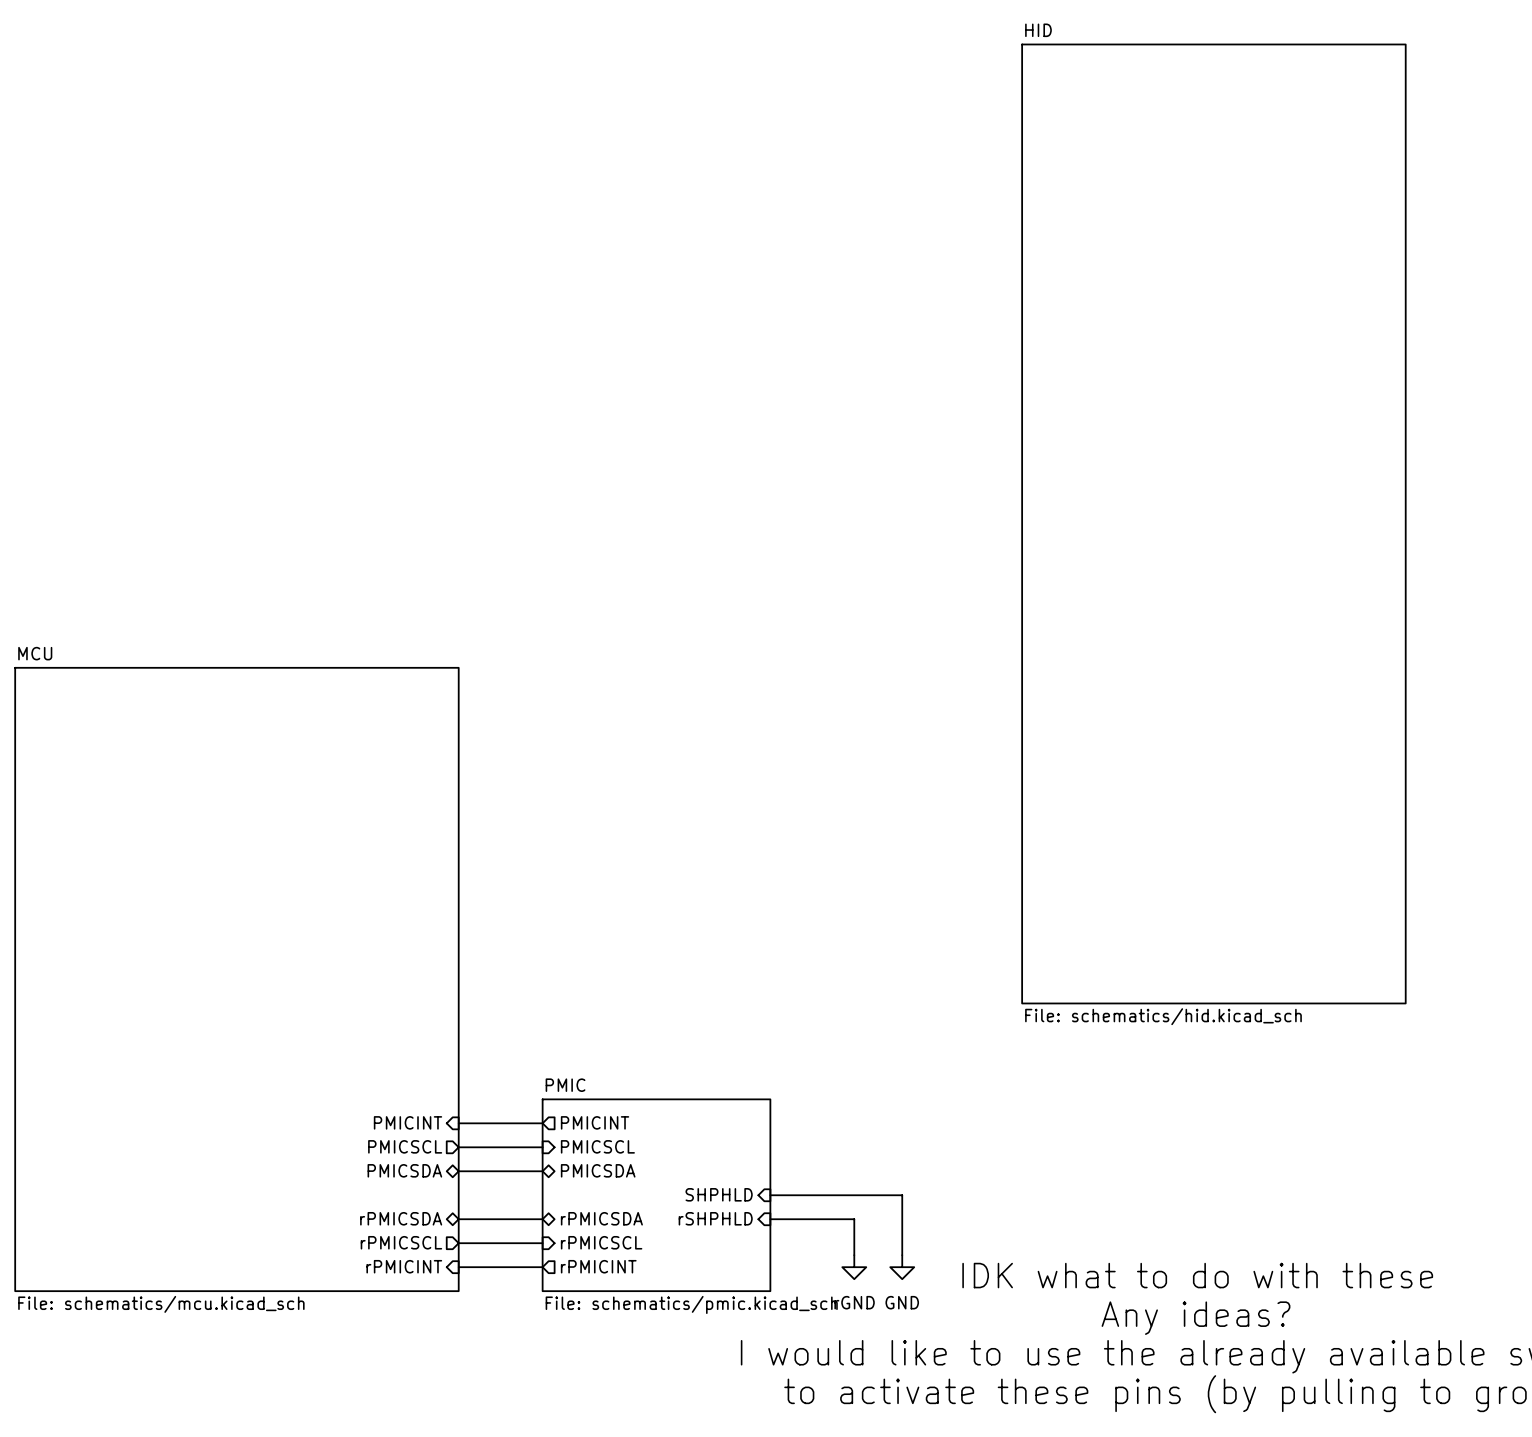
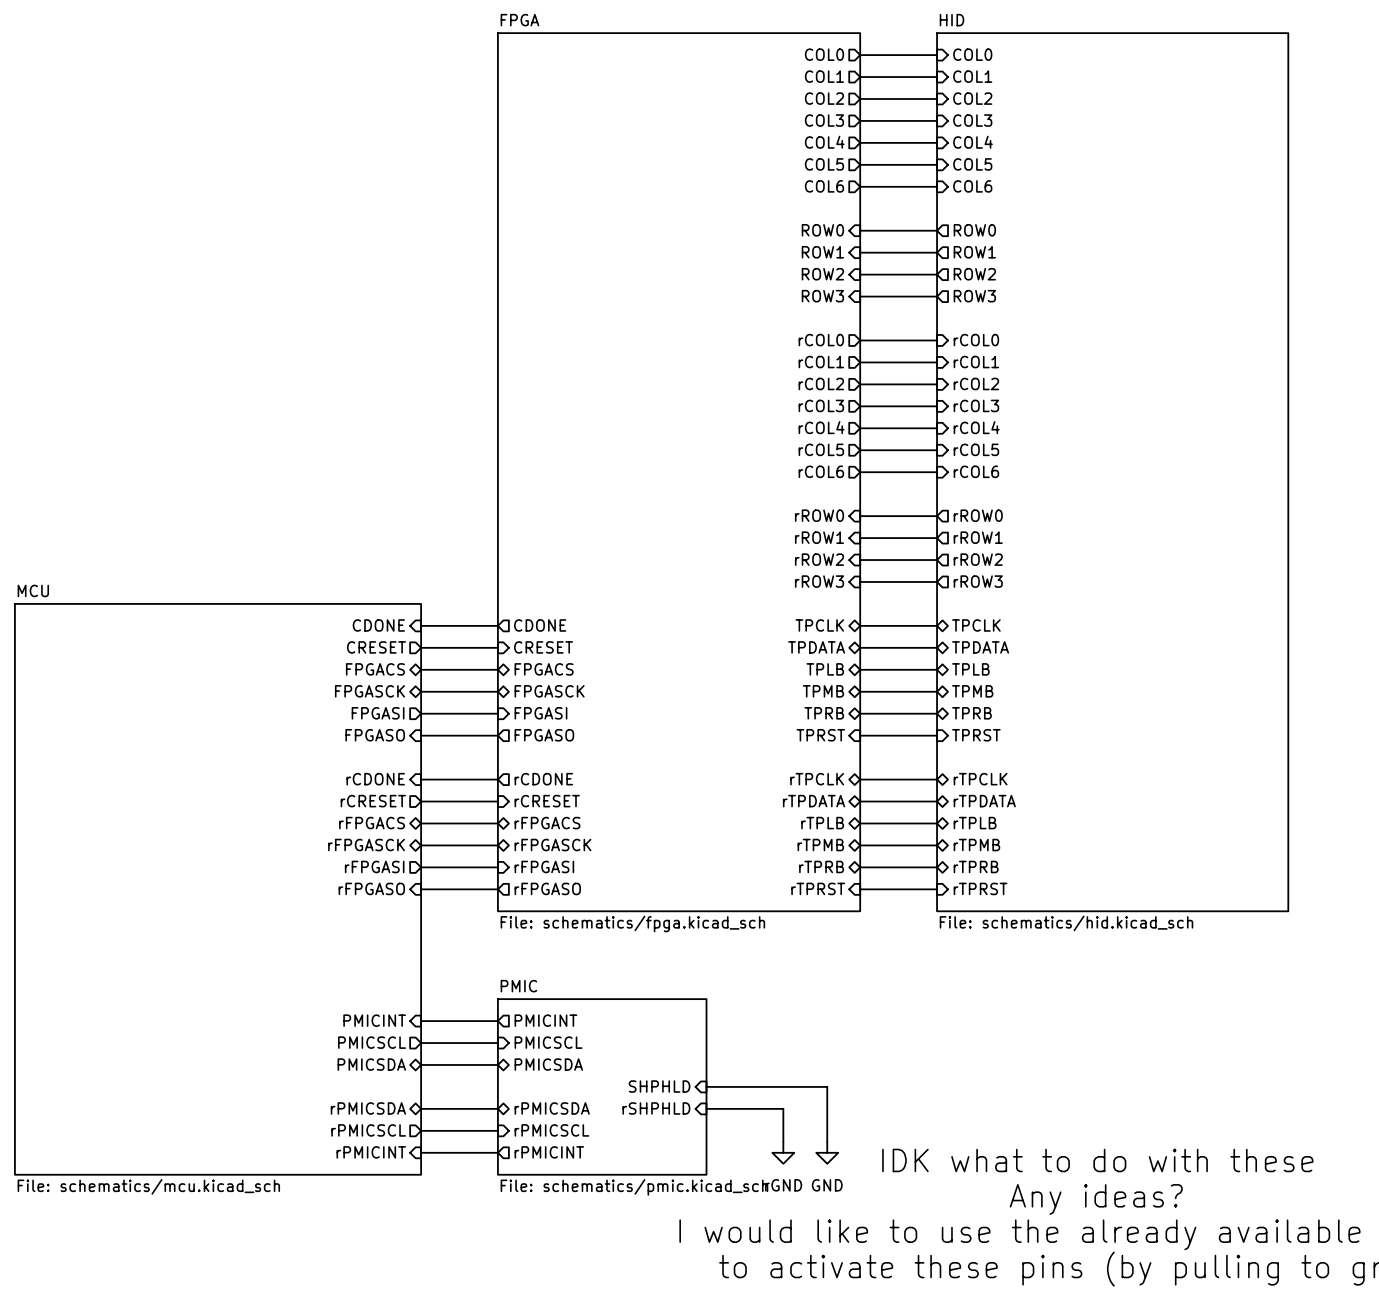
sheet pin: none -> COL0 (824, 54)
wire: none -> (860, 55) (937, 55)
sheet pin: none -> COL0 (972, 54)
sheet pin: none -> COL1 (824, 76)
sheet pin: none -> COL1 (972, 76)
wire: none -> (860, 77) (937, 77)
sheet pin: none -> COL2 (824, 98)
sheet pin: none -> COL2 (972, 98)
wire: none -> (860, 98) (937, 98)
sheet pin: none -> COL3 (824, 120)
sheet pin: none -> COL3 (972, 120)
wire: none -> (860, 120) (937, 120)
sheet pin: none -> COL4 (824, 142)
sheet pin: none -> COL4 (973, 142)
wire: none -> (860, 142) (937, 142)
sheet pin: none -> COL5 (824, 164)
sheet pin: none -> COL5 (972, 164)
wire: none -> (860, 164) (937, 164)
sheet pin: none -> COL6 (824, 186)
sheet pin: none -> COL6 (972, 186)
wire: none -> (860, 186) (937, 186)
sheet pin: none -> ROW0 (822, 230)
sheet pin: none -> ROW0 (974, 230)
wire: none -> (860, 230) (937, 230)
sheet pin: none -> ROW1 (822, 252)
sheet pin: none -> ROW1 (974, 252)
wire: none -> (860, 252) (937, 252)
sheet pin: none -> ROW2 (822, 274)
sheet pin: none -> ROW2 (974, 274)
wire: none -> (860, 274) (937, 274)
sheet pin: none -> ROW3 (822, 296)
sheet pin: none -> ROW3 (974, 296)
wire: none -> (860, 296) (937, 296)
sheet pin: none -> rCOL0 (821, 340)
sheet pin: none -> rCOL0 (976, 340)
wire: none -> (860, 340) (937, 340)
sheet pin: none -> rCOL1 (821, 362)
sheet pin: none -> rCOL1 (976, 362)
wire: none -> (860, 362) (937, 362)
sheet pin: none -> rCOL2 (821, 383)
sheet pin: none -> rCOL2 (976, 383)
wire: none -> (860, 384) (937, 384)
sheet pin: none -> rCOL3 (821, 405)
sheet pin: none -> rCOL3 (976, 405)
wire: none -> (860, 406) (937, 406)
sheet pin: none -> rCOL4 (821, 427)
sheet pin: none -> rCOL4 (976, 427)
wire: none -> (860, 428) (937, 428)
sheet pin: none -> rCOL5 (821, 449)
wire: none -> (860, 450) (937, 450)
sheet pin: none -> rCOL5 (976, 449)
sheet FPGA: none -> File: schematics/fpga.kicad_sch (679, 472)
sheet pin: none -> rCOL6 (821, 471)
wire: none -> (860, 472) (937, 472)
sheet pin: none -> rCOL6 (976, 471)
sheet pin: none -> rROW0 (819, 515)
wire: none -> (860, 516) (937, 516)
sheet pin: none -> rROW0 (978, 515)
sheet pin: none -> rROW1 (819, 537)
wire: none -> (860, 538) (937, 538)
sheet pin: none -> rROW1 (978, 537)
sheet pin: none -> rROW2 (819, 559)
wire: none -> (860, 560) (937, 560)
sheet pin: none -> rROW2 (978, 559)
sheet pin: none -> rROW3 (819, 581)
wire: none -> (860, 581) (937, 581)
sheet pin: none -> rROW3 (978, 581)
sheet pin: none -> CDONE (378, 625)
wire: none -> (421, 625) (497, 625)
sheet pin: none -> CDONE (540, 625)
sheet pin: none -> TPCLK (819, 625)
wire: none -> (860, 625) (937, 625)
sheet pin: none -> TPCLK (976, 625)
sheet pin: none -> CRESET (376, 647)
wire: none -> (421, 647) (497, 647)
sheet pin: none -> CRESET (543, 647)
sheet pin: none -> TPDATA (816, 647)
wire: none -> (860, 647) (937, 647)
sheet pin: none -> TPDATA (980, 647)
sheet pin: none -> FPGACS (375, 669)
wire: none -> (421, 669) (497, 669)
sheet pin: none -> FPGACS (544, 669)
sheet pin: none -> TPLB (825, 669)
wire: none -> (860, 669) (937, 669)
sheet pin: none -> TPLB (970, 669)
sheet pin: none -> FPGASCK (369, 691)
wire: none -> (421, 691) (497, 691)
sheet pin: none -> FPGASCK (549, 691)
sheet pin: none -> TPMB (823, 691)
wire: none -> (860, 691) (937, 691)
sheet pin: none -> TPMB (972, 691)
sheet pin: none -> FPGASI (378, 713)
wire: none -> (421, 713) (497, 713)
sheet pin: none -> FPGASI (540, 713)
sheet pin: none -> TPRB (824, 713)
wire: none -> (860, 713) (937, 713)
sheet pin: none -> TPRB (971, 713)
sheet pin: none -> FPGASO (375, 735)
wire: none -> (421, 735) (497, 735)
sheet pin: none -> FPGASO (544, 735)
sheet pin: none -> TPRST (820, 735)
wire: none -> (860, 735) (937, 735)
sheet pin: none -> TPRST (976, 735)
sheet pin: none -> rCDONE (375, 779)
wire: none -> (421, 779) (497, 779)
sheet pin: none -> rCDONE (543, 779)
sheet pin: none -> rTPCLK (817, 779)
wire: none -> (860, 779) (937, 779)
sheet pin: none -> rTPCLK (980, 779)
sheet pin: none -> rCRESET (373, 801)
wire: none -> (421, 801) (497, 801)
sheet pin: none -> rCRESET (547, 801)
sheet pin: none -> rTPDATA (814, 801)
wire: none -> (860, 801) (937, 801)
sheet pin: none -> rTPDATA (984, 801)
sheet pin: none -> rFPGACS (372, 823)
wire: none -> (421, 823) (497, 823)
sheet pin: none -> rFPGACS (547, 823)
sheet pin: none -> rTPLB (822, 823)
wire: none -> (860, 823) (937, 823)
sheet pin: none -> rTPLB (975, 823)
sheet pin: none -> rFPGASCK (366, 845)
wire: none -> (421, 845) (497, 845)
sheet pin: none -> rFPGASCK (553, 845)
sheet pin: none -> rTPMB (820, 845)
wire: none -> (860, 845) (937, 845)
sheet pin: none -> rTPMB (976, 845)
sheet pin: none -> rFPGASI (374, 866)
wire: none -> (421, 867) (497, 867)
sheet pin: none -> rFPGASI (544, 866)
sheet pin: none -> rTPRB (821, 866)
wire: none -> (860, 867) (937, 867)
sheet pin: none -> rTPRB (976, 866)
sheet pin: none -> rFPGASO (371, 888)
wire: none -> (421, 889) (497, 889)
sheet pin: none -> rFPGASO (547, 888)
sheet pin: none -> rTPRST (818, 888)
wire: none -> (860, 889) (937, 889)
sheet pin: none -> rTPRST (980, 888)

